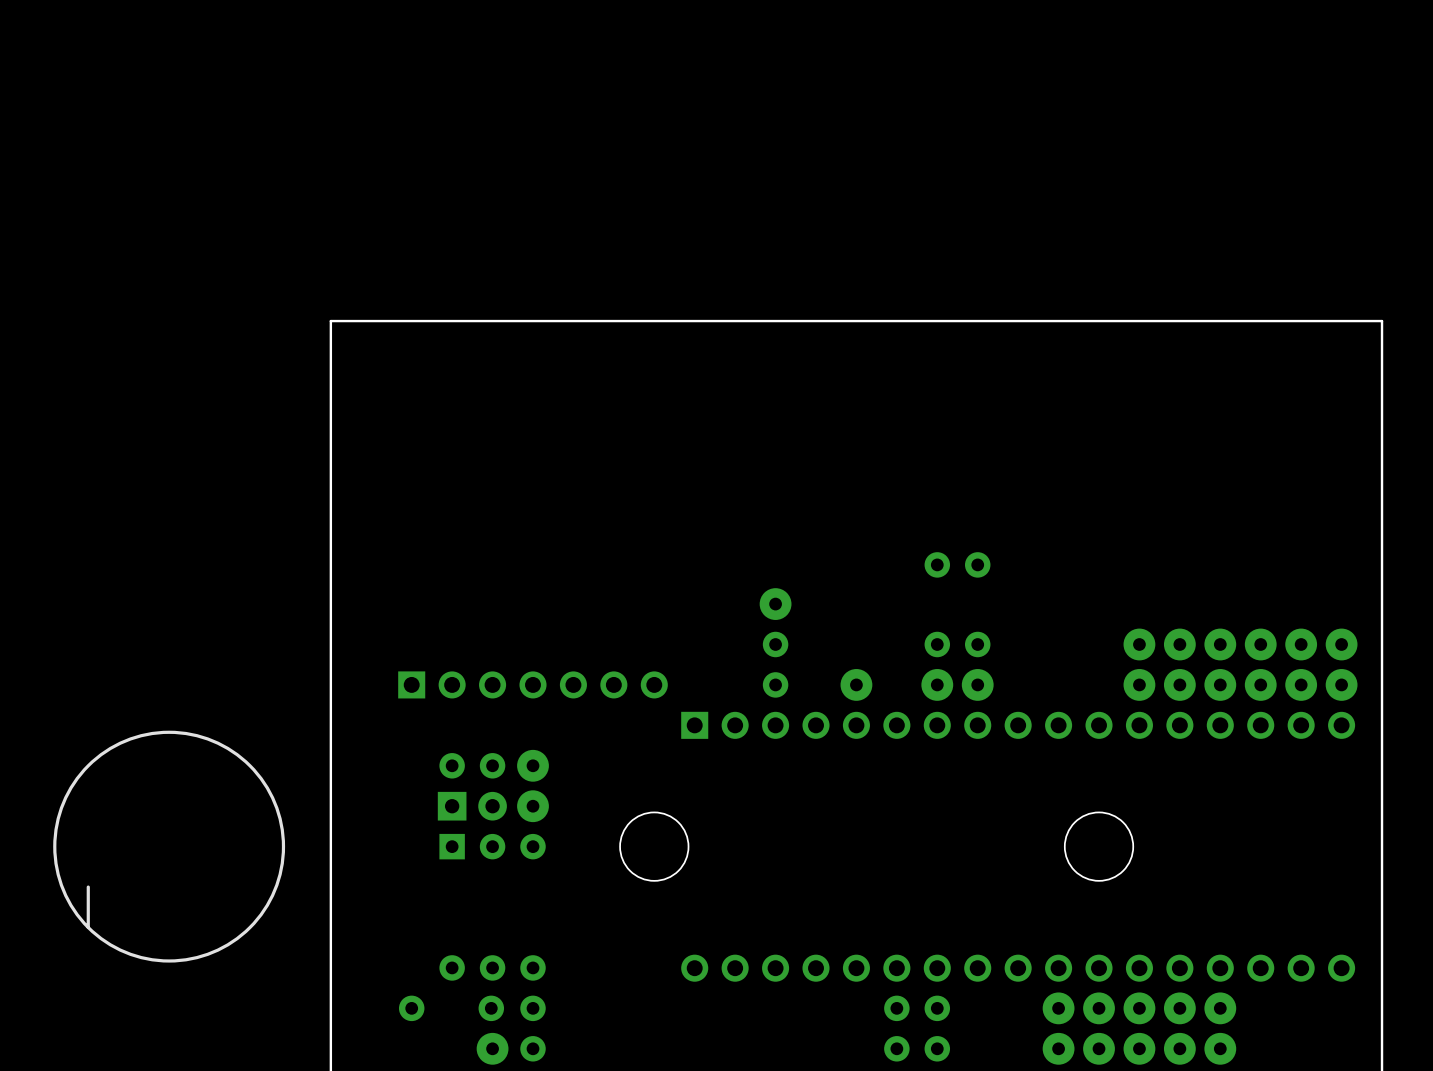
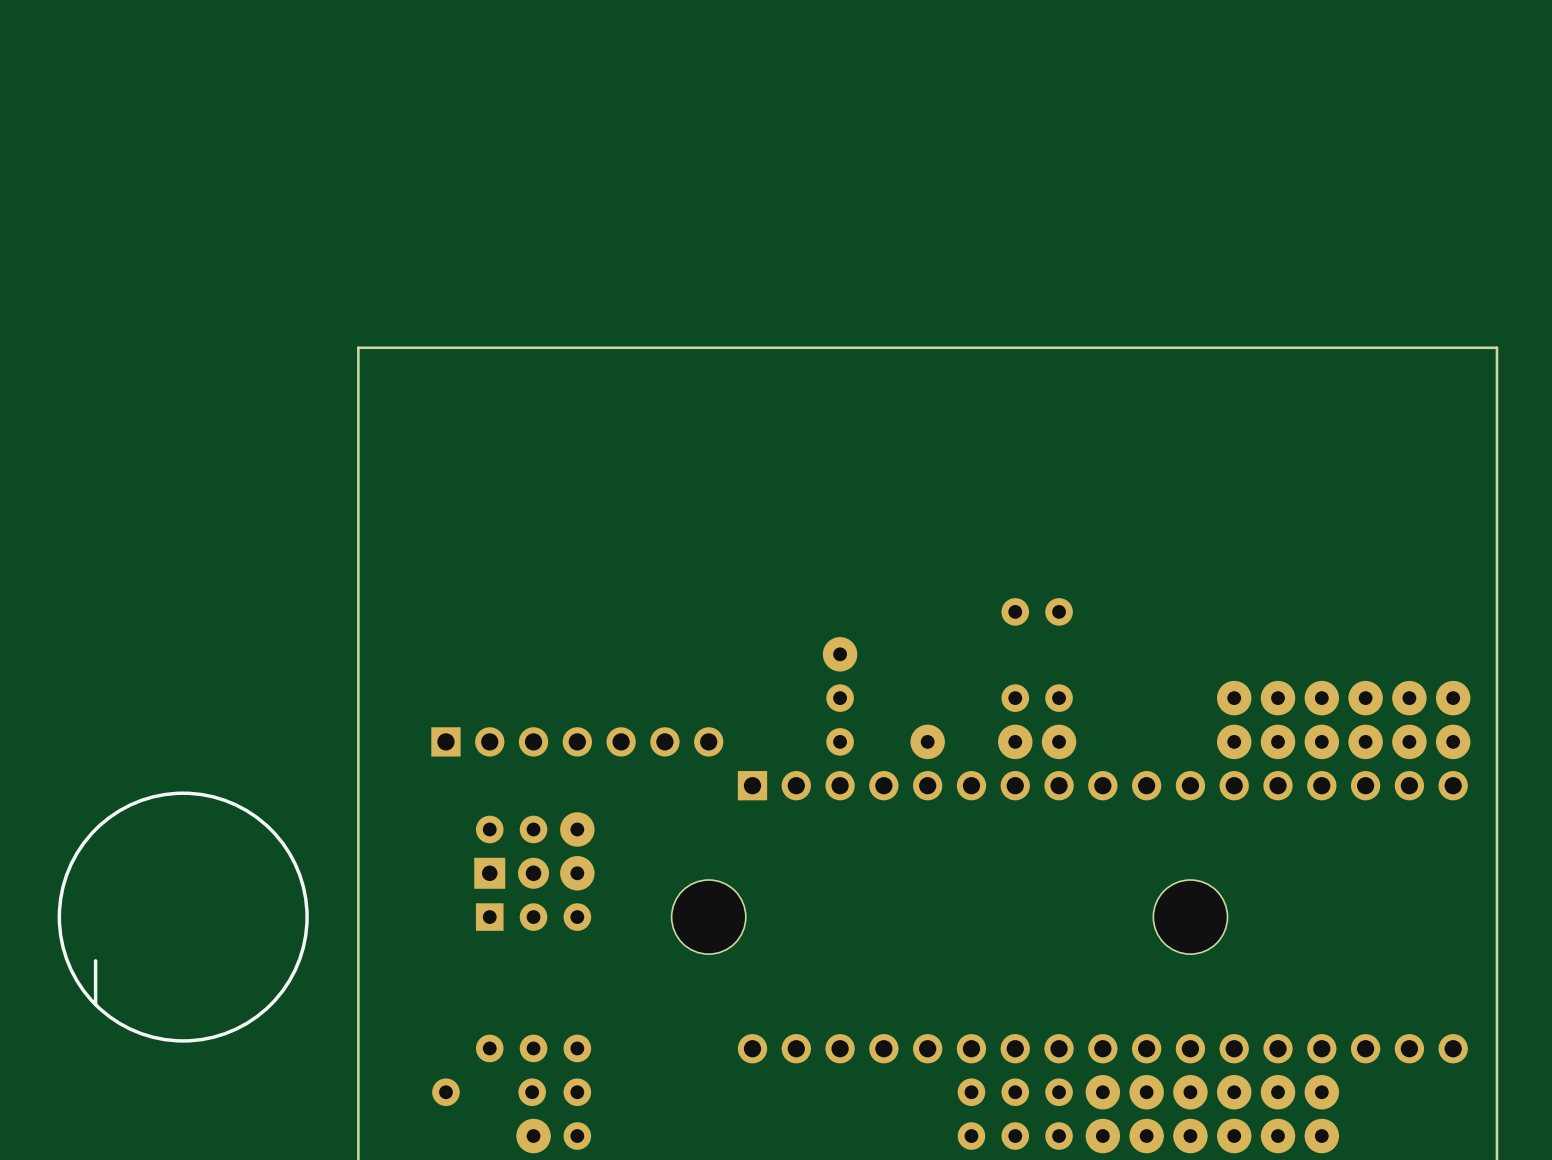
part: none -> (1102, 1092)
part: none -> (1059, 1114)
part: none -> (1102, 1136)

